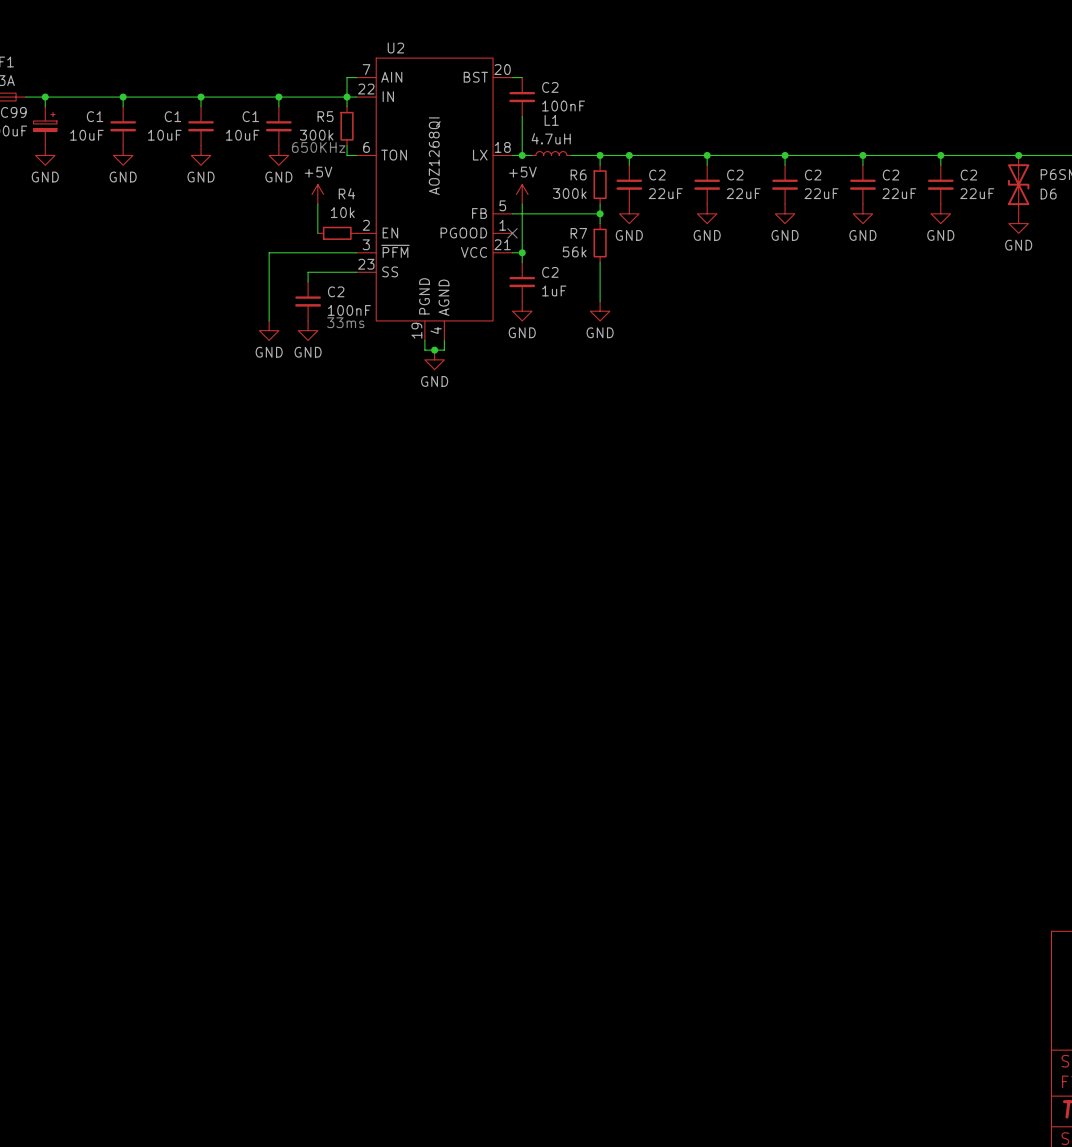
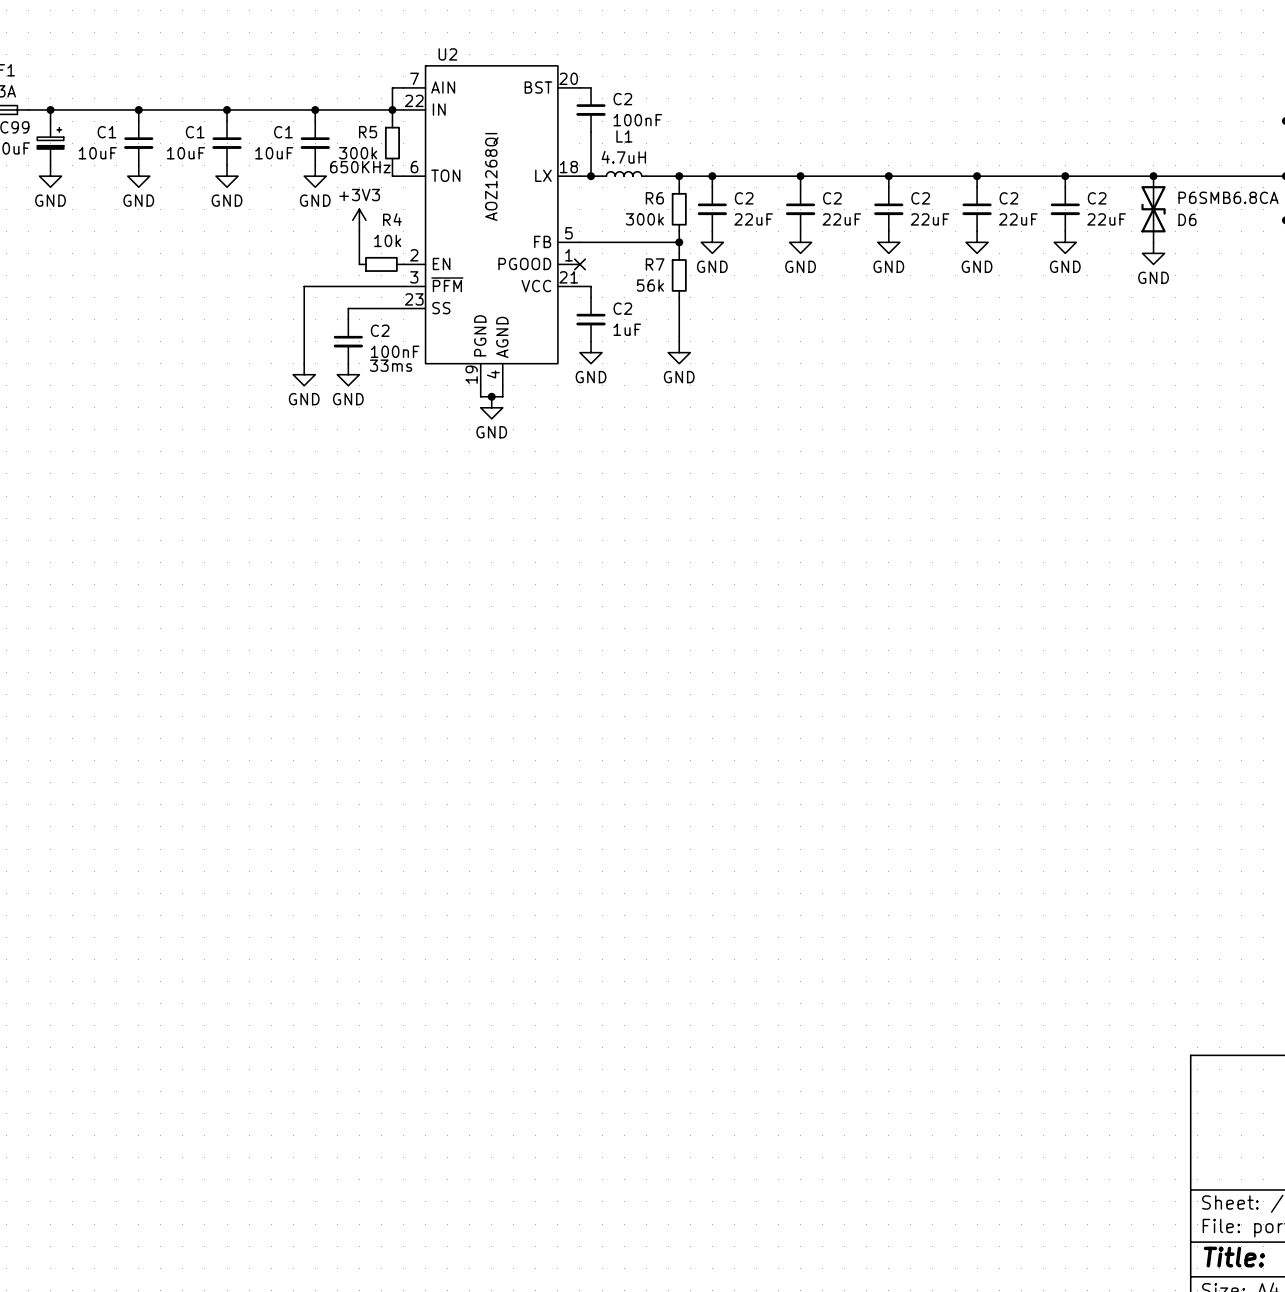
power symbol: +5V (317, 194) -> +3V3 (359, 220)
power symbol: +5V (522, 194) -> none
wire: (522, 204) (522, 252) -> none
junction: (522, 252) -> none

